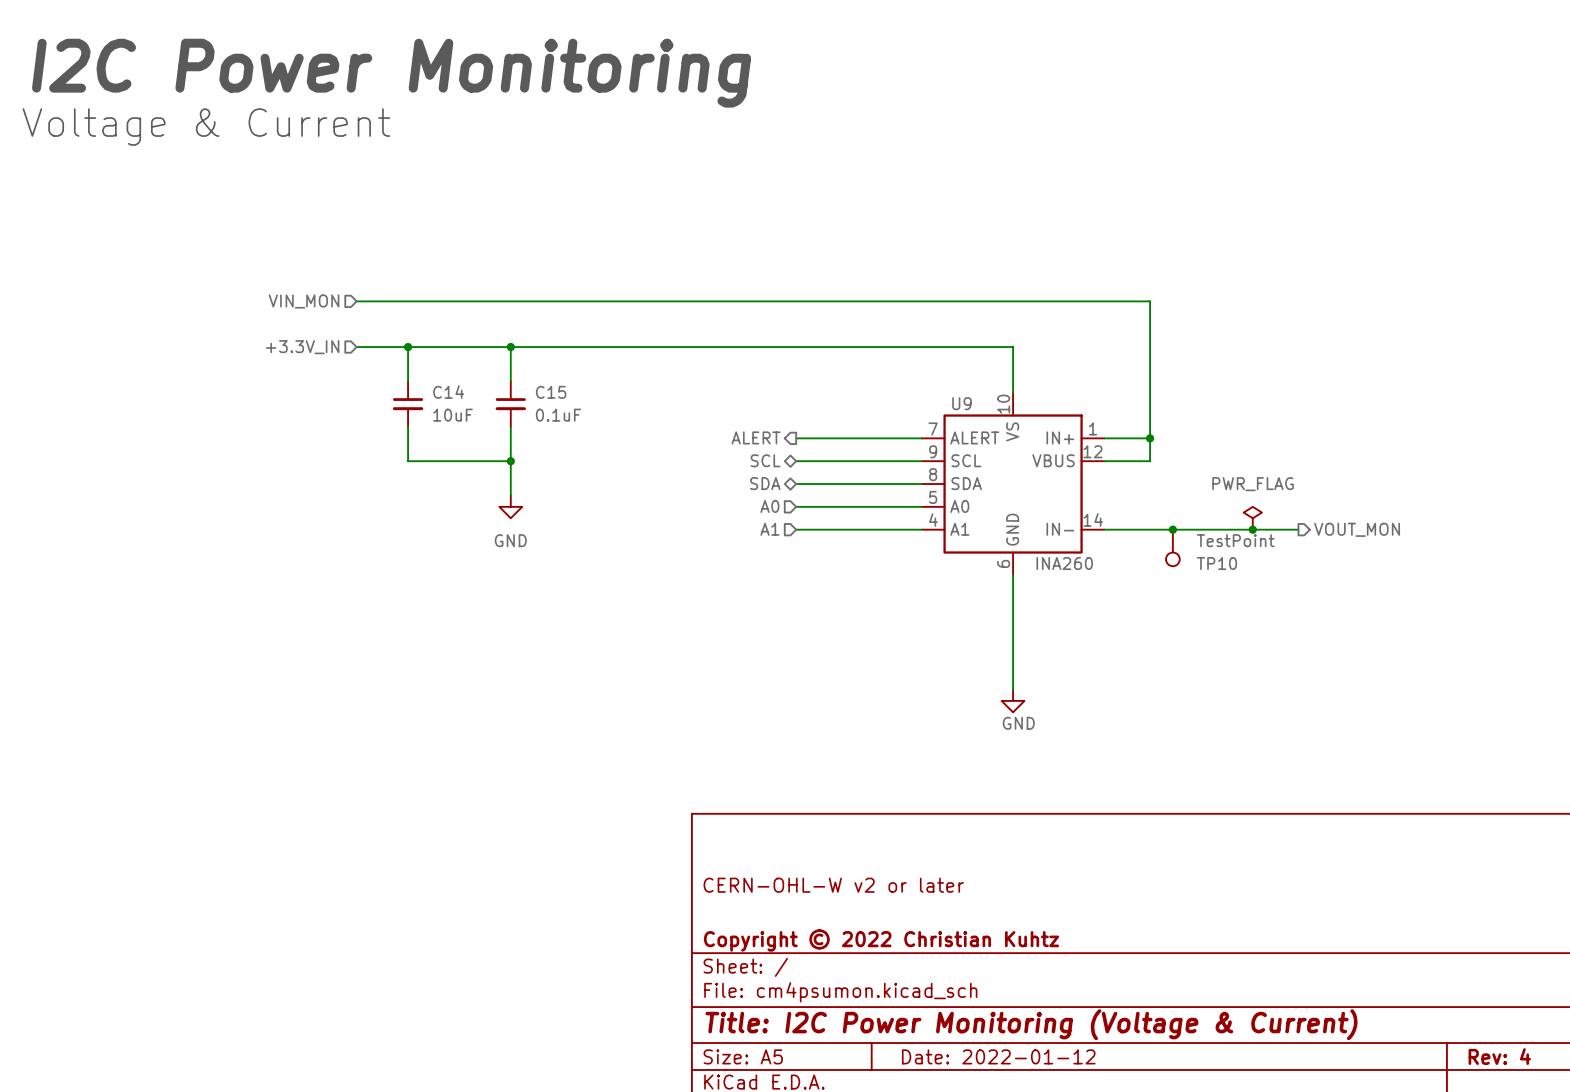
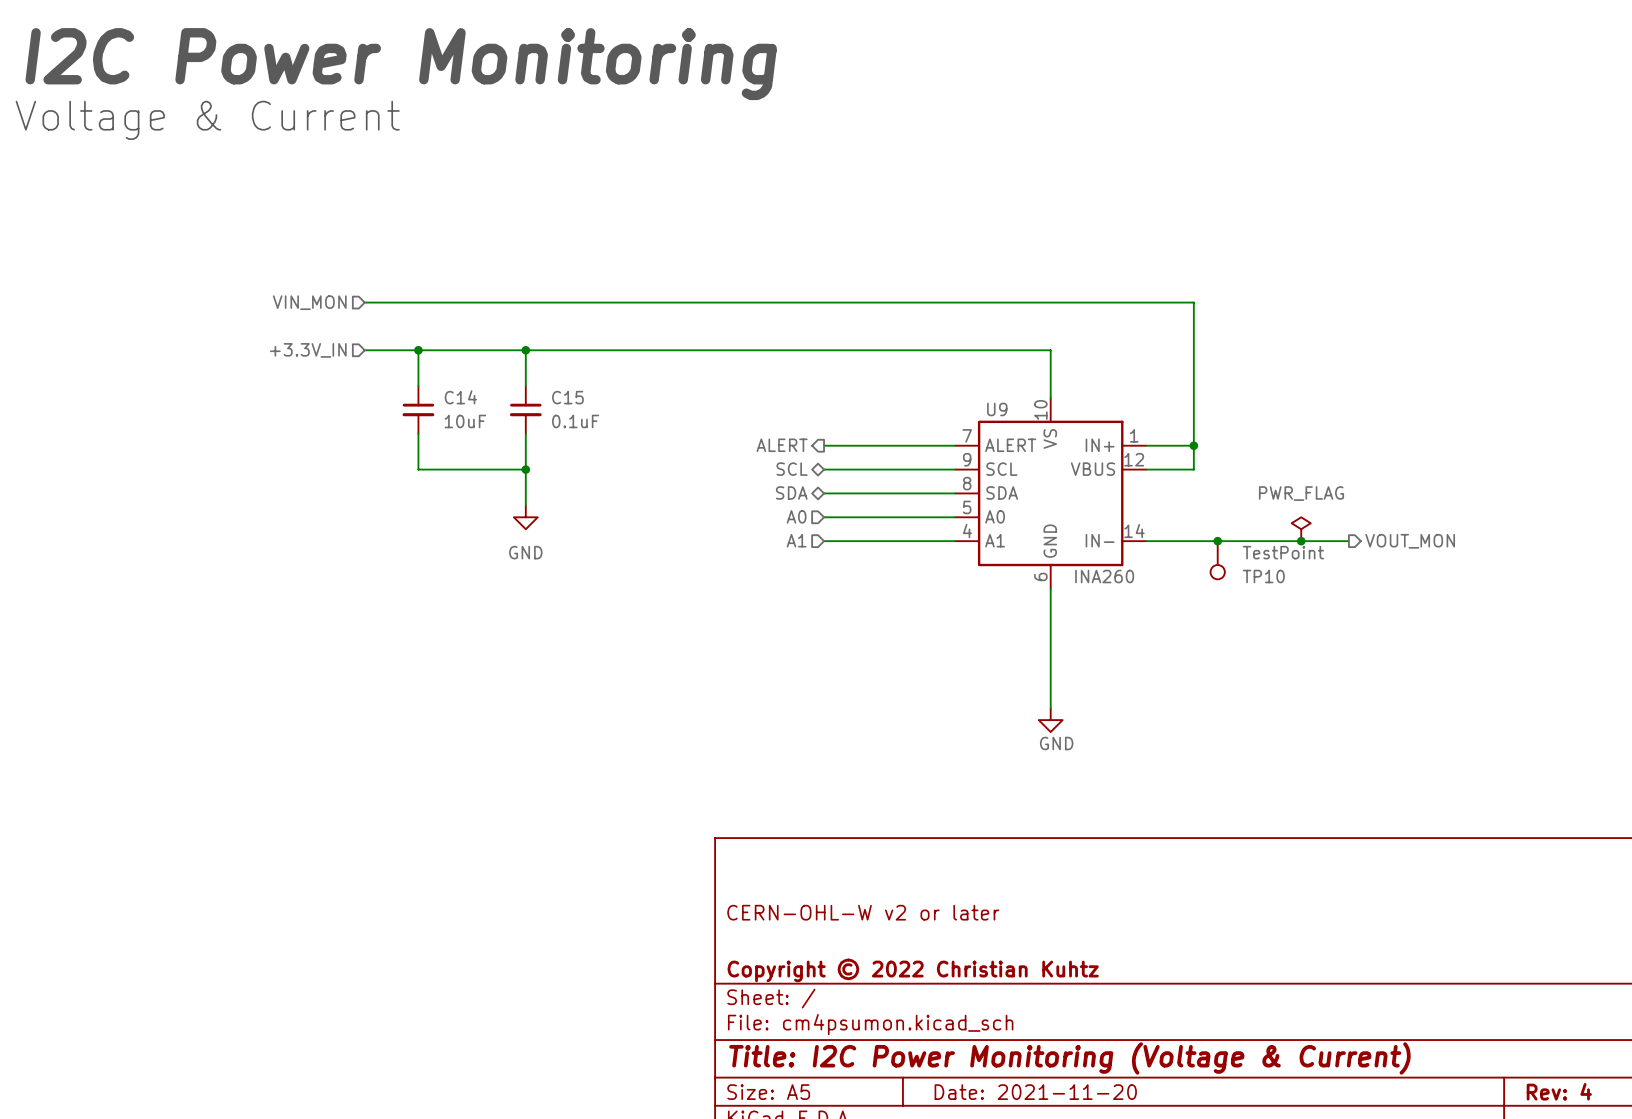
title block: Date: 2022-01-12 (998, 1056) -> Date: 2021-11-20 (1035, 1092)

